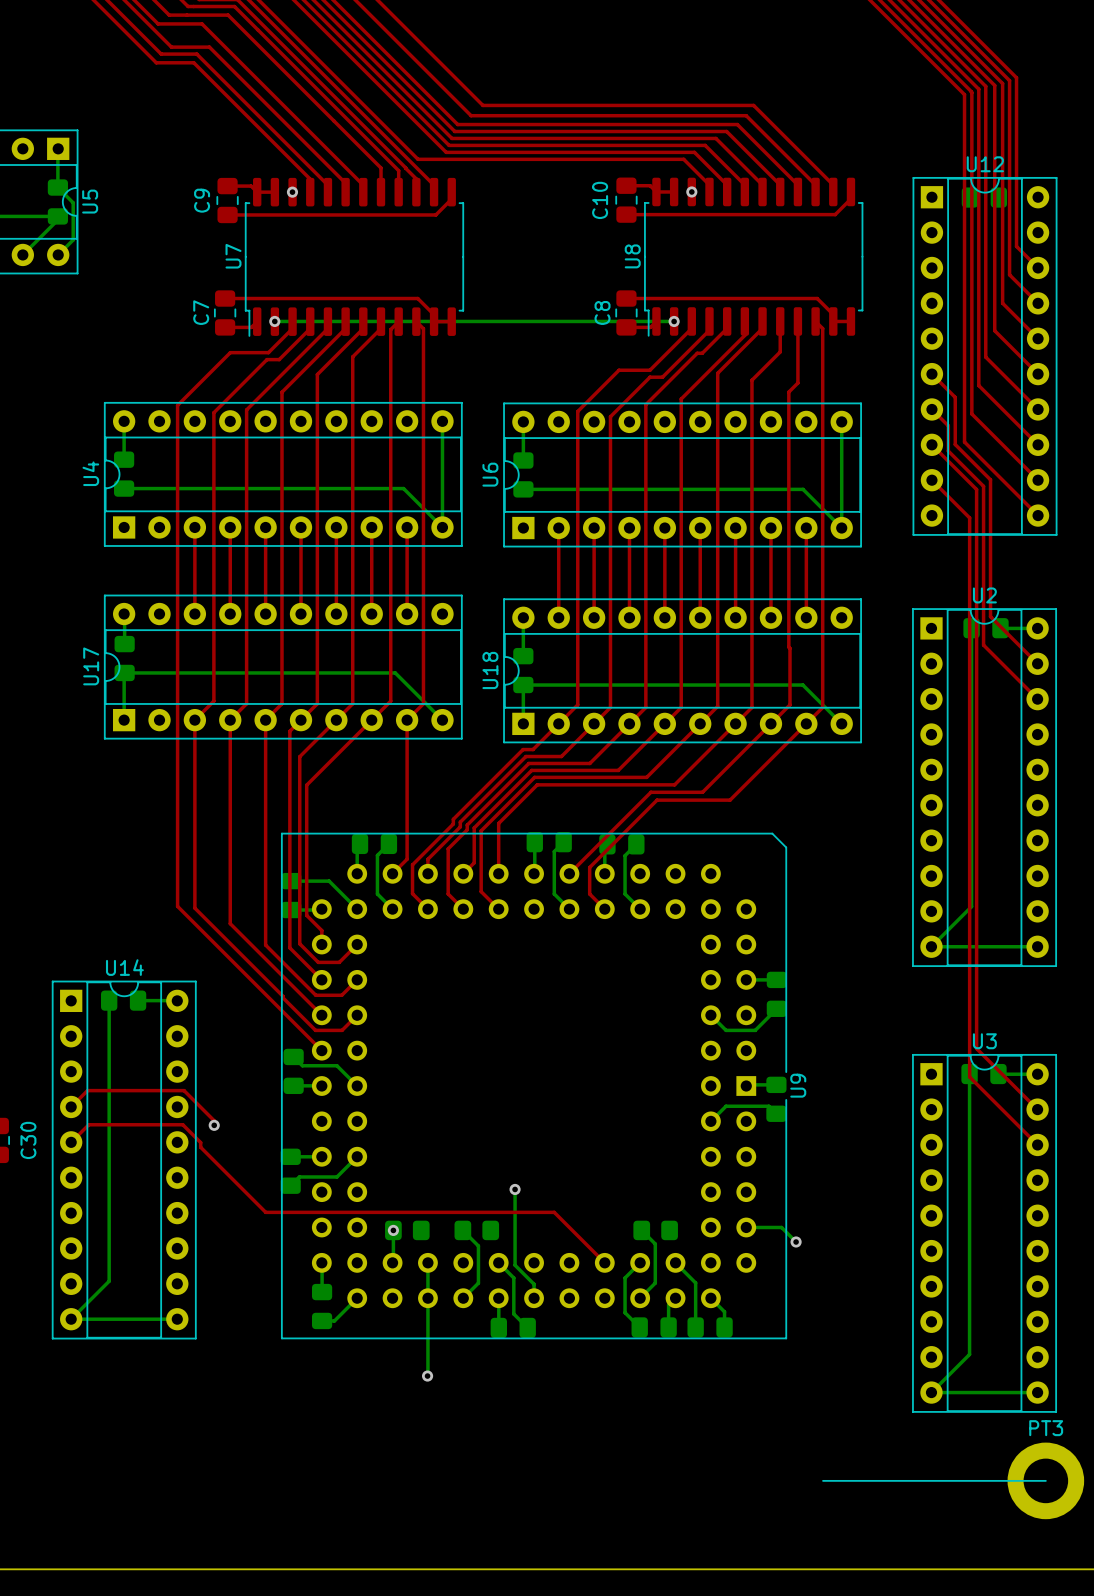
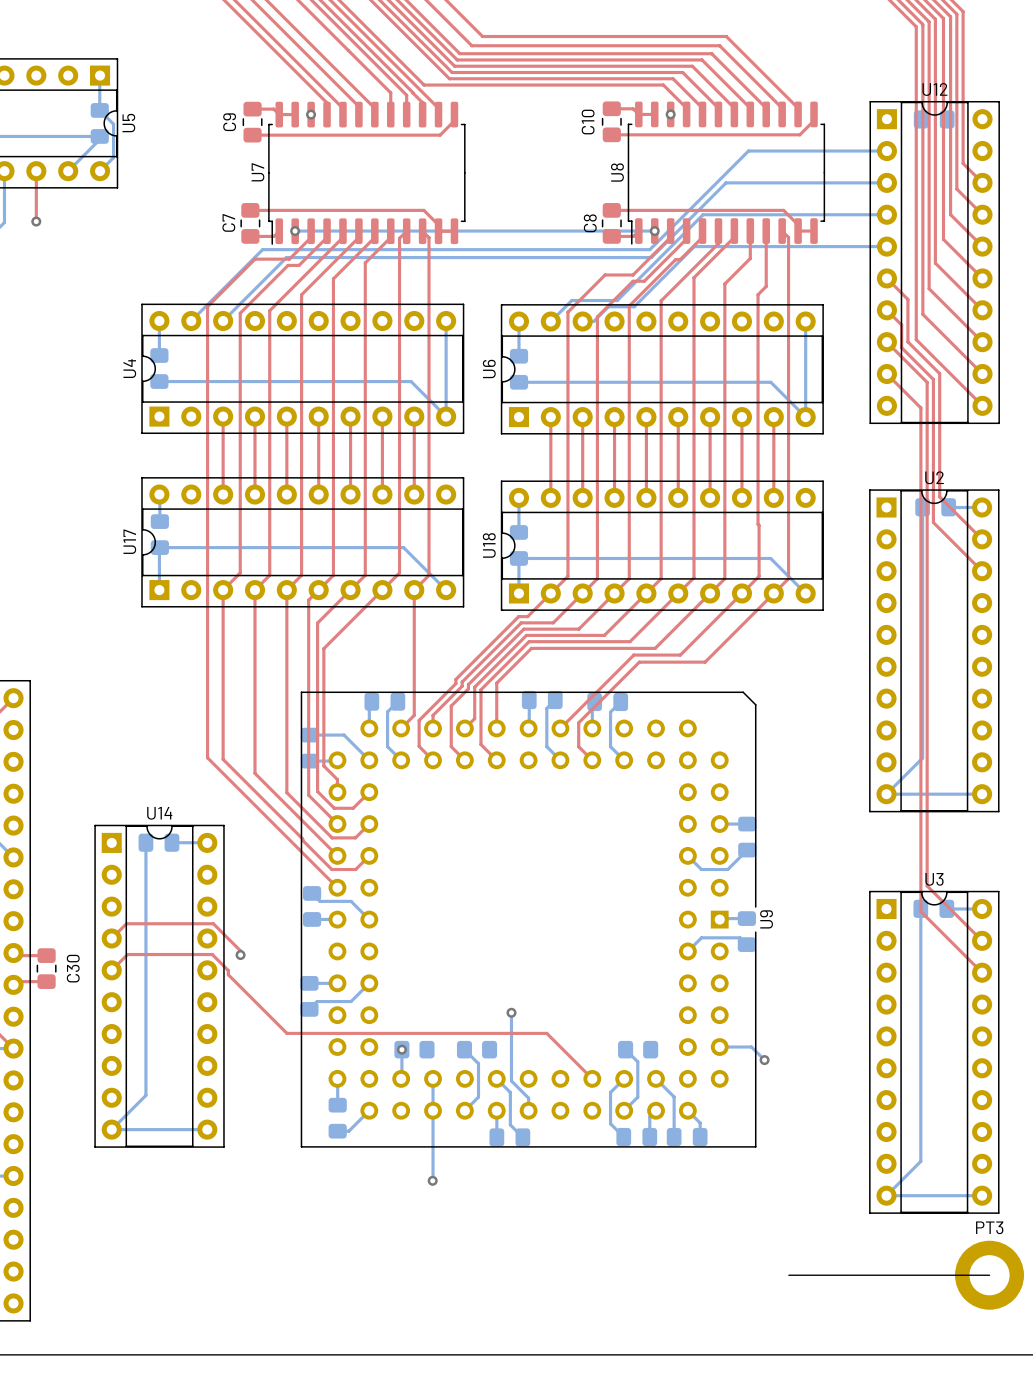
bottom track: none -> (886, 151) (748, 151) (649, 249) (262, 249) (191, 321)
bottom track: none -> (886, 182) (726, 182) (651, 257) (286, 257) (223, 321)
bottom track: none -> (886, 214) (703, 214) (617, 300) (571, 300) (550, 321)
bottom track: none -> (886, 246) (694, 246) (634, 306) (608, 306) (593, 321) (582, 321)

